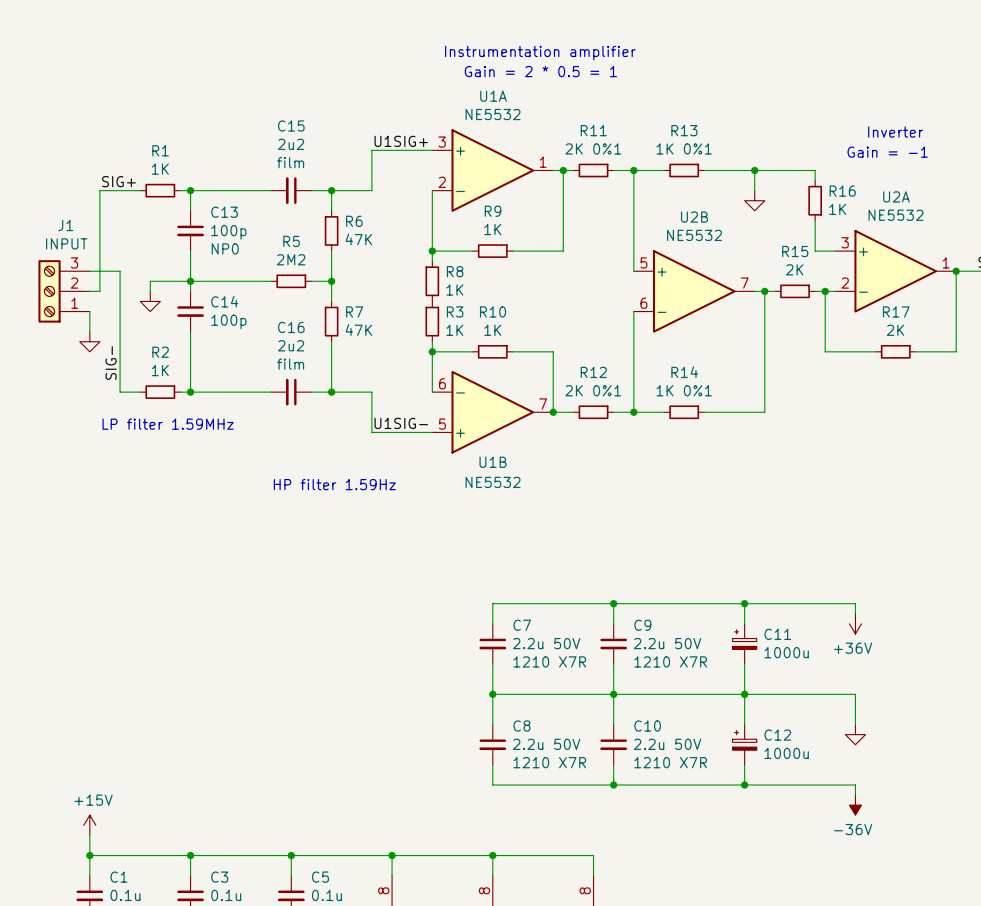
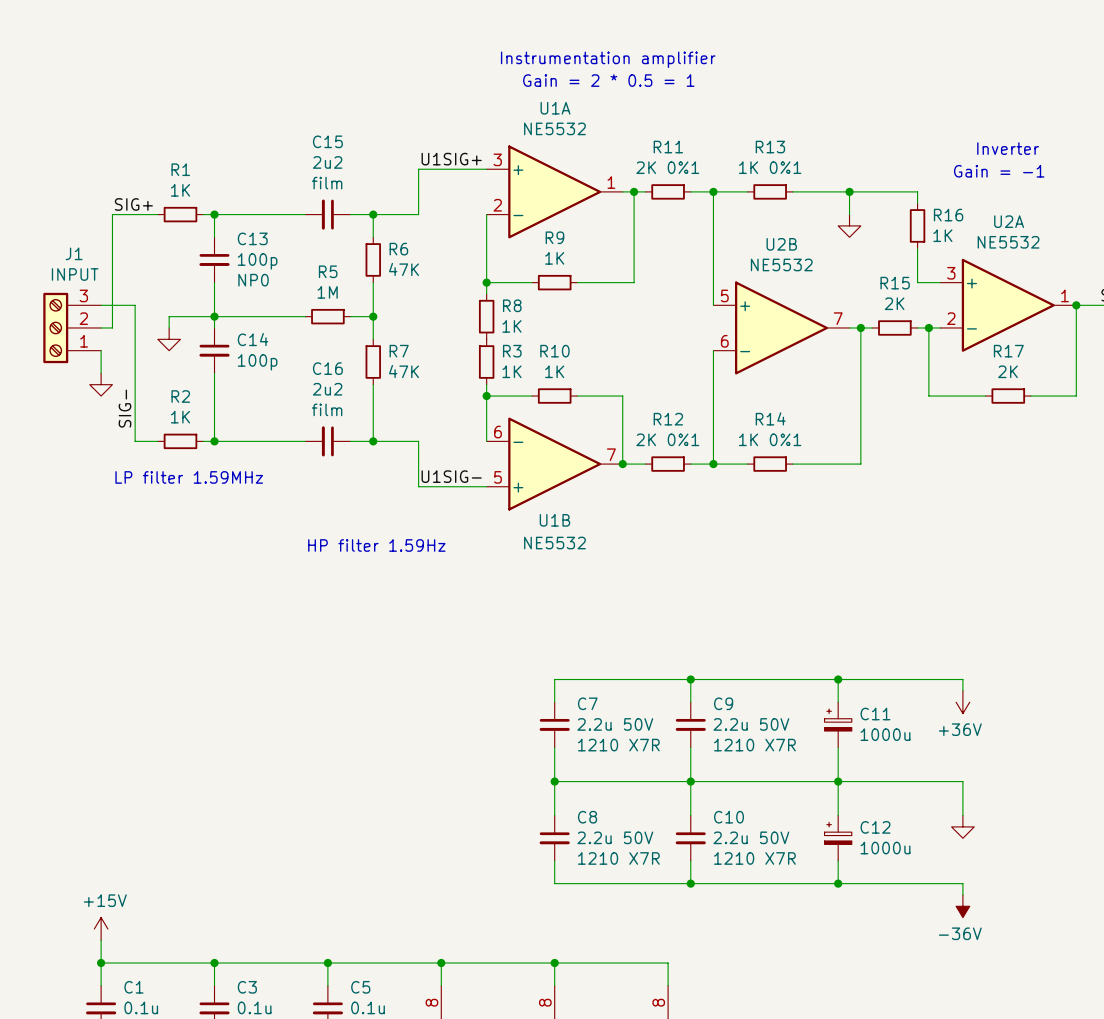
R5 value: 2M2 (291, 259) -> 1M (327, 292)

